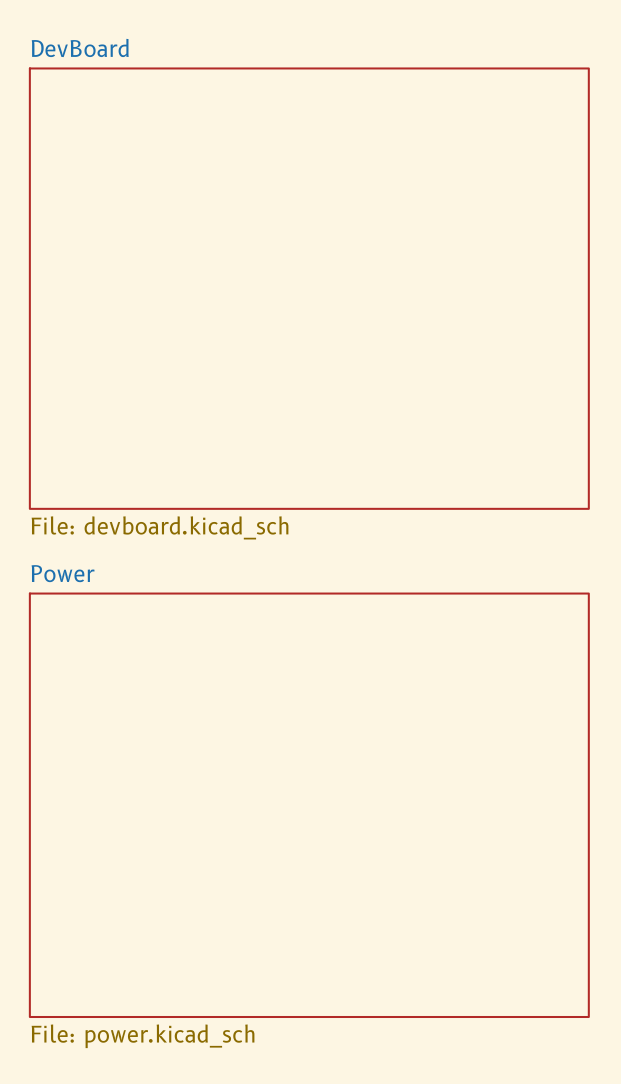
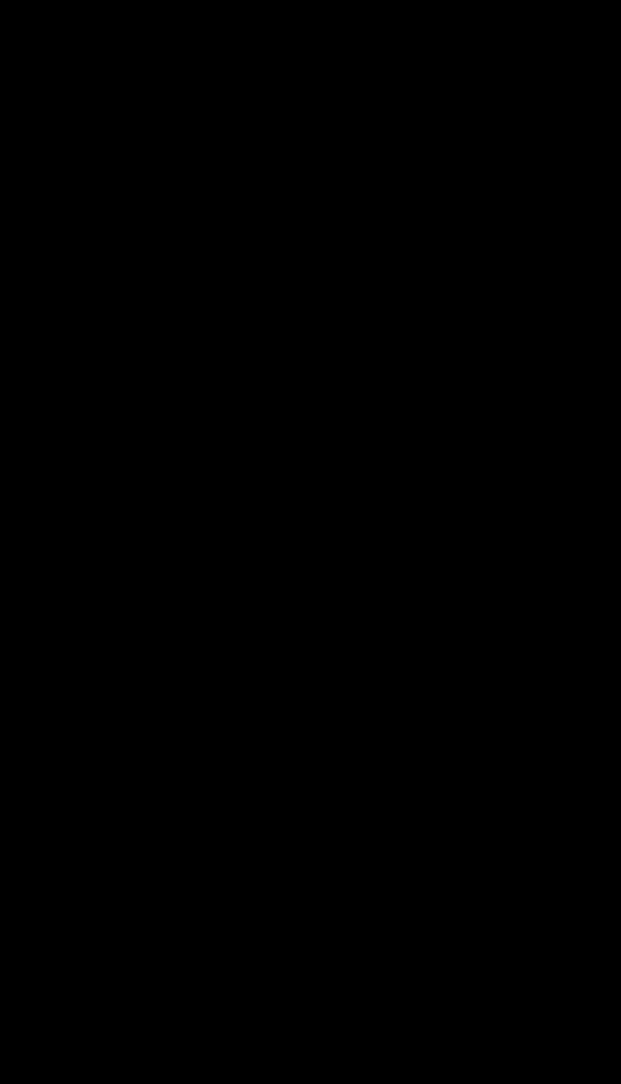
sheet DevBoard: File: devboard.kicad_sch (309, 288) -> none
sheet Power: File: power.kicad_sch (309, 805) -> none

